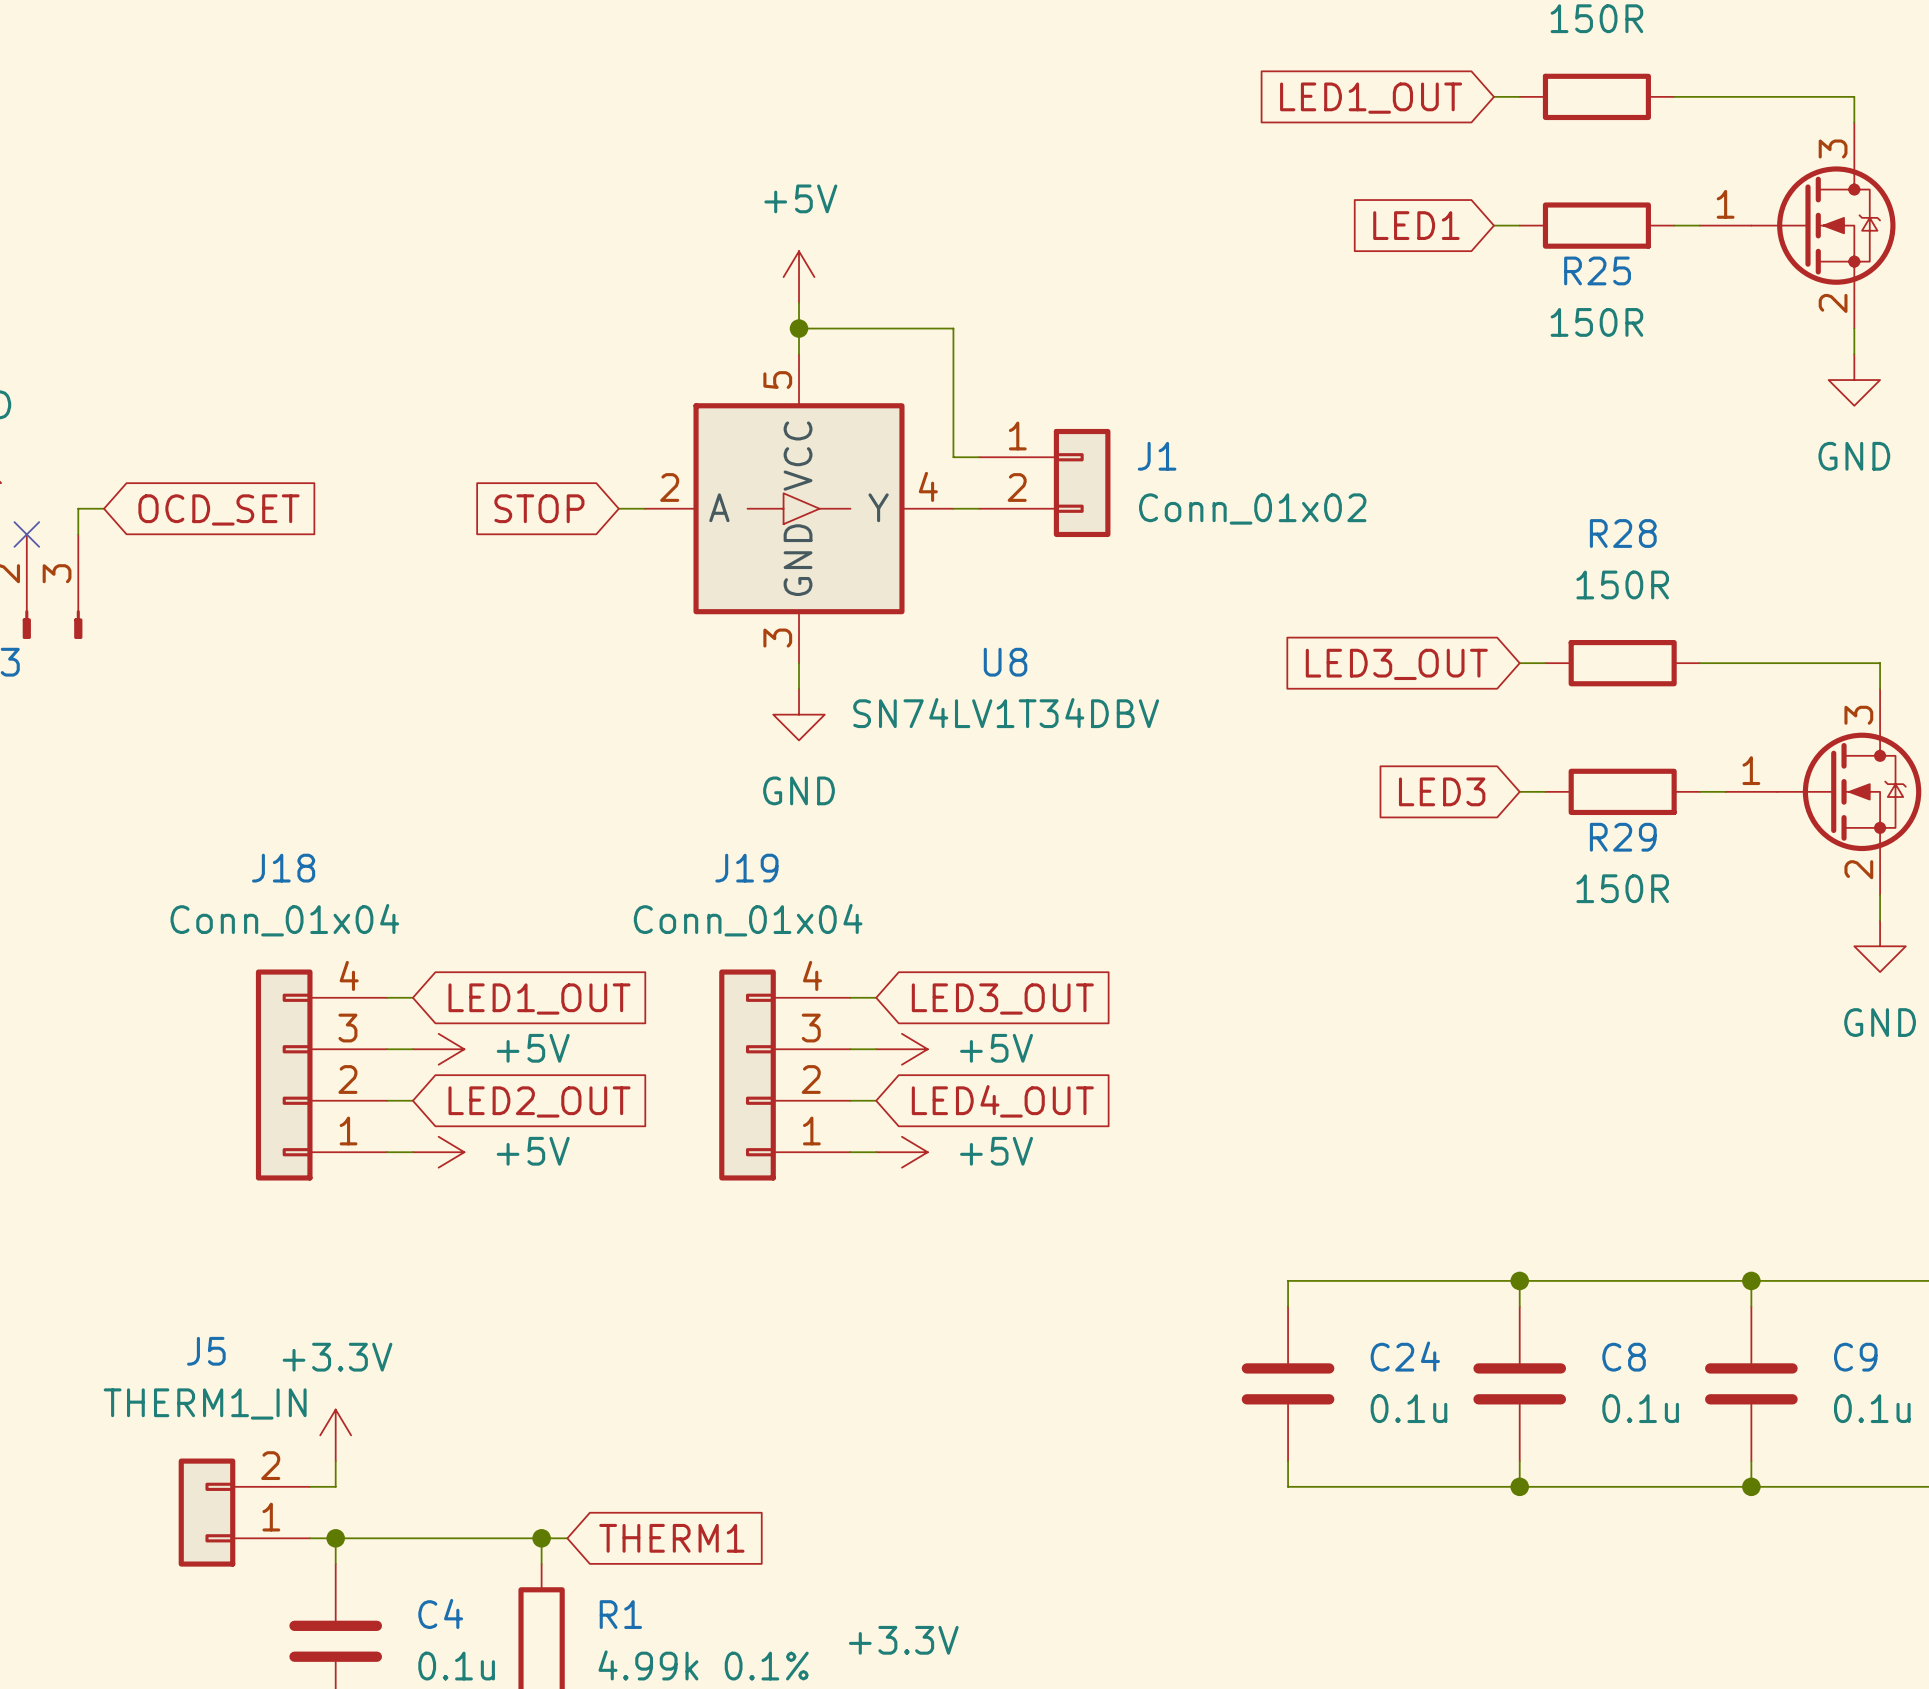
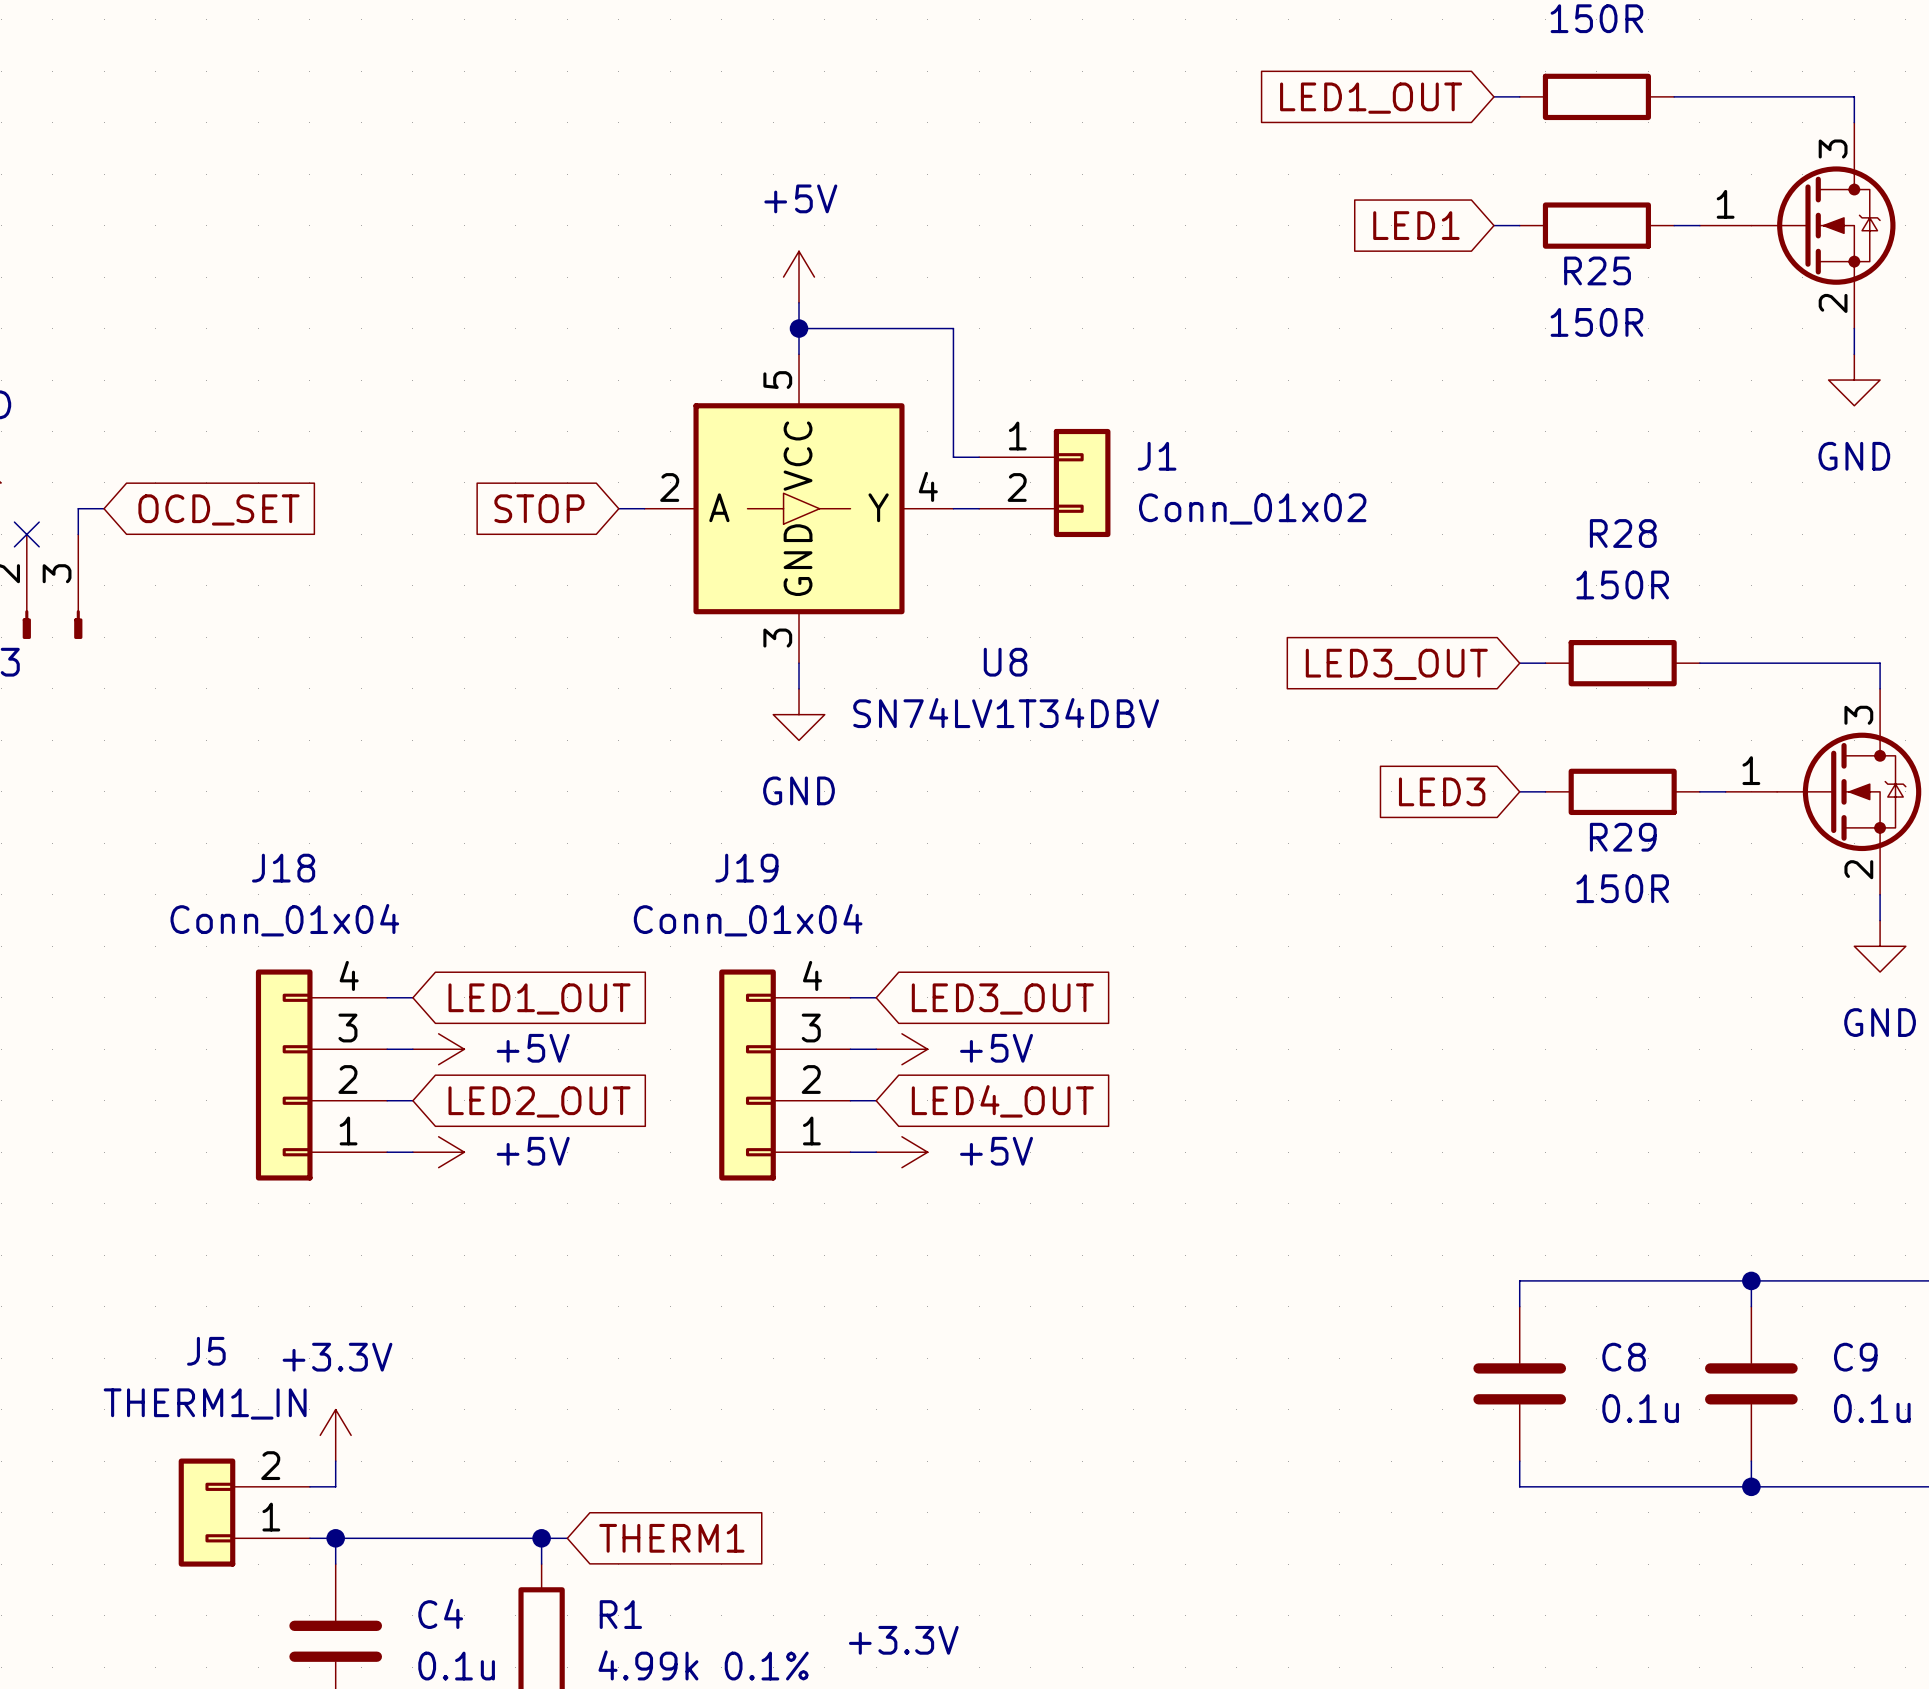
wire: (1519, 1280) (1288, 1280) (1288, 1306) -> none
junction: (1519, 1280) -> none
C24: 0.1u (1288, 1383) -> none
wire: (1288, 1461) (1288, 1486) (1519, 1486) -> none
junction: (1519, 1486) -> none

